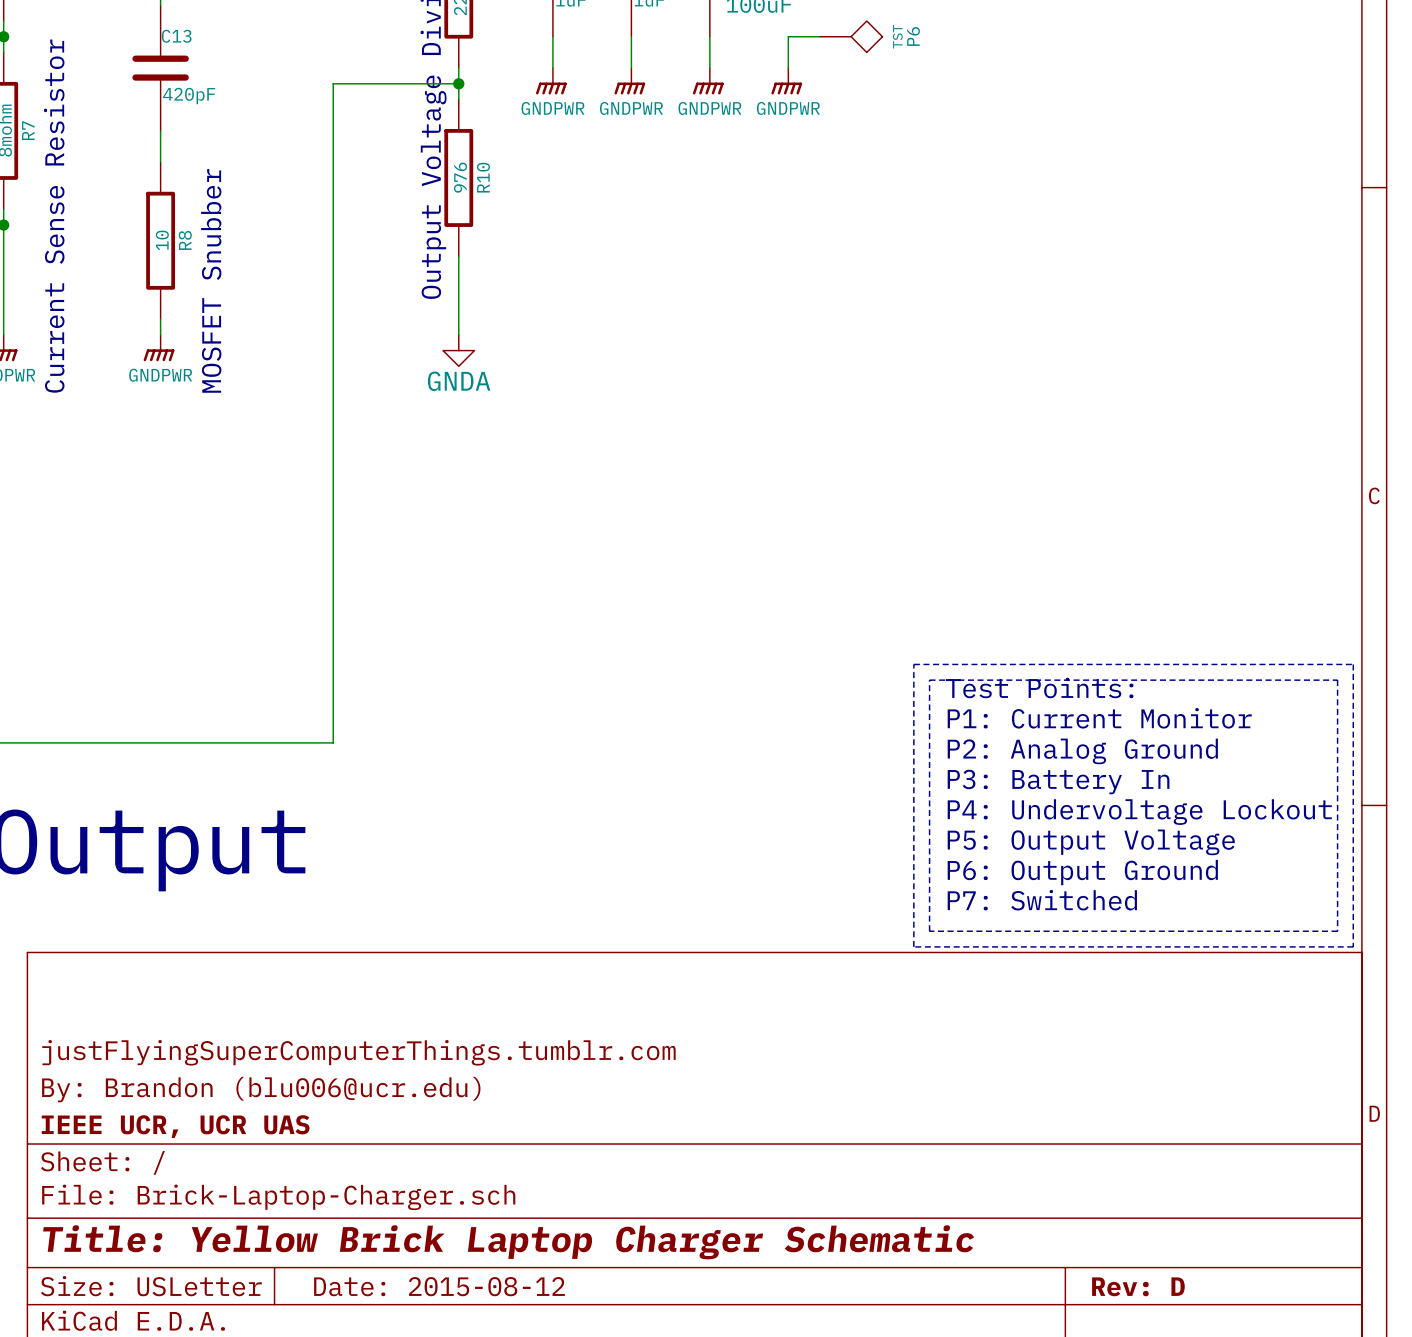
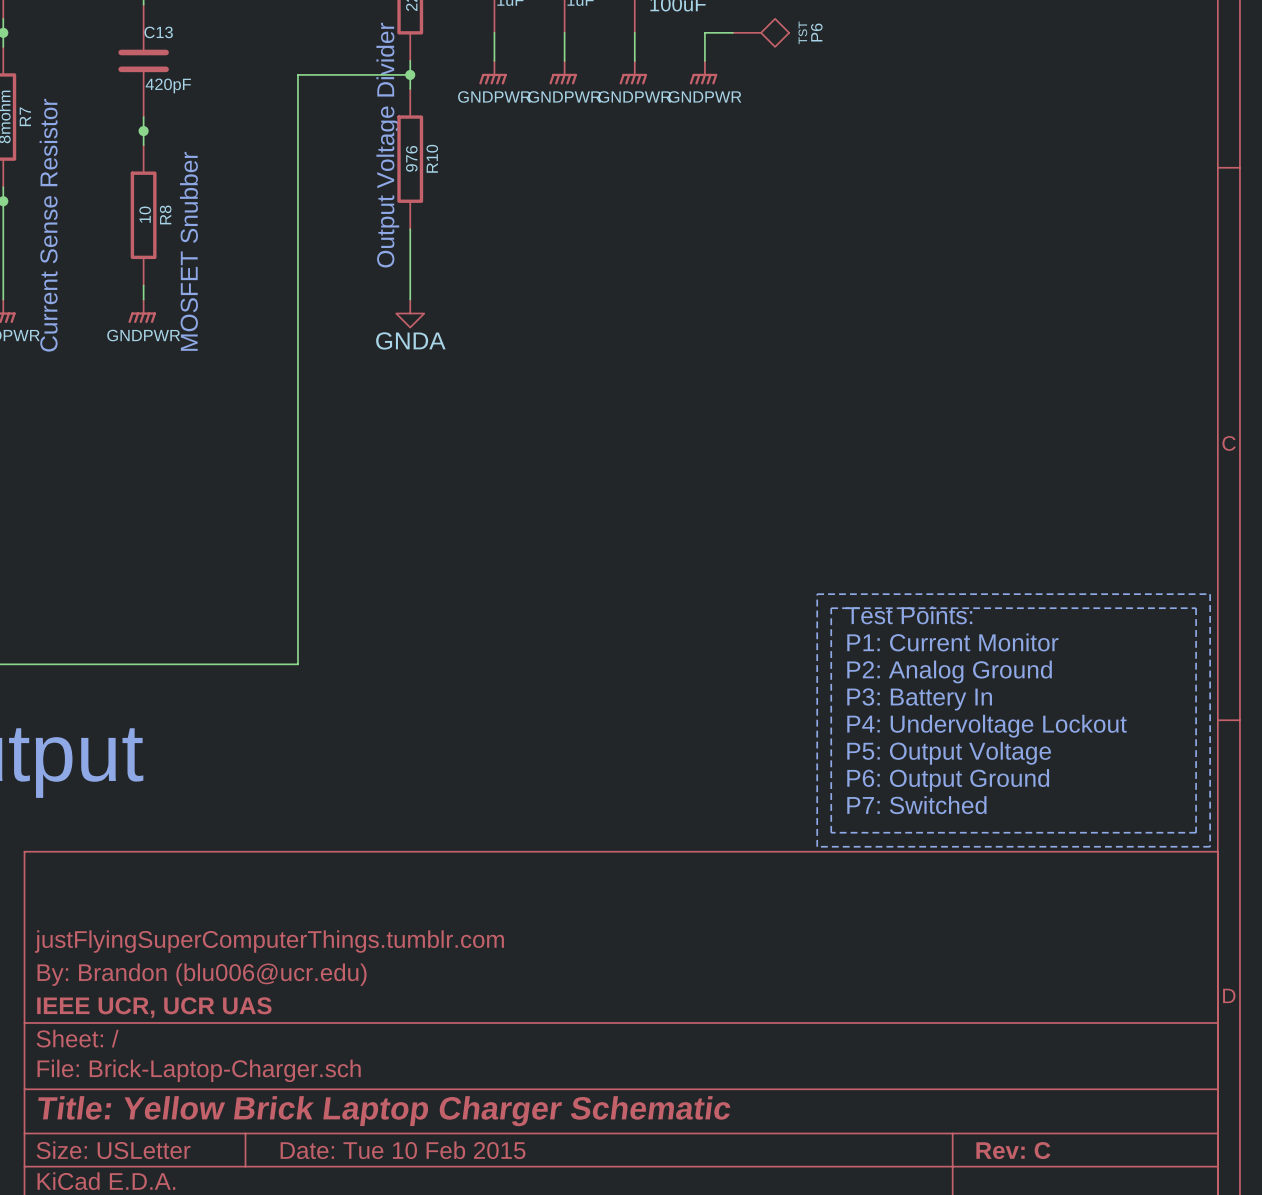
junction: none -> (143, 131)
title block: Date: 2015-08-12 (439, 1286) -> Date: Tue 10 Feb 2015 (403, 1150)
title block: Rev: D (1138, 1286) -> Rev: C (1013, 1150)

